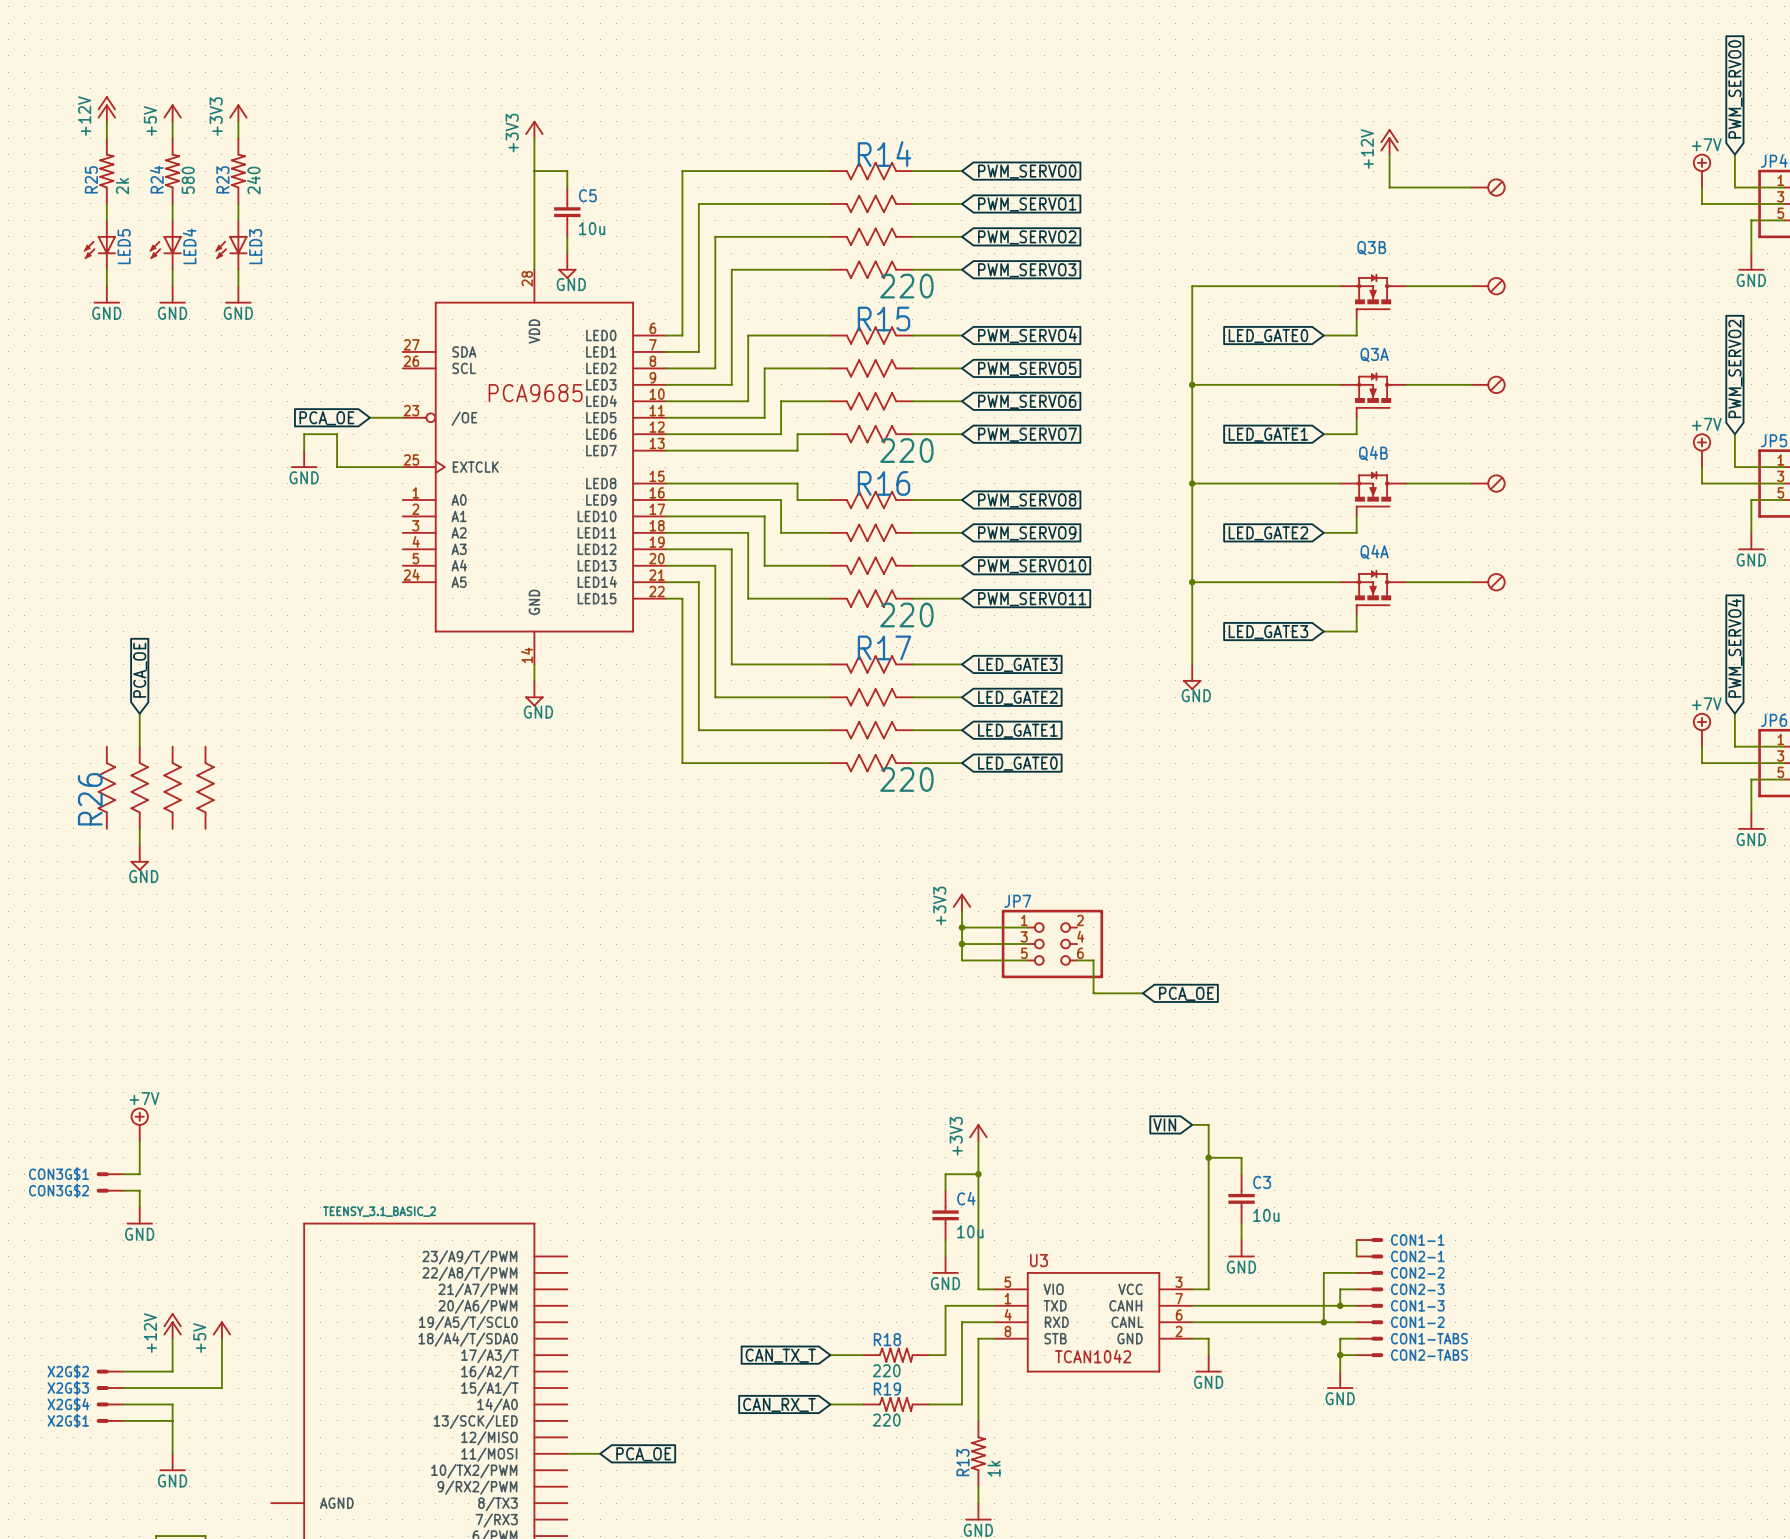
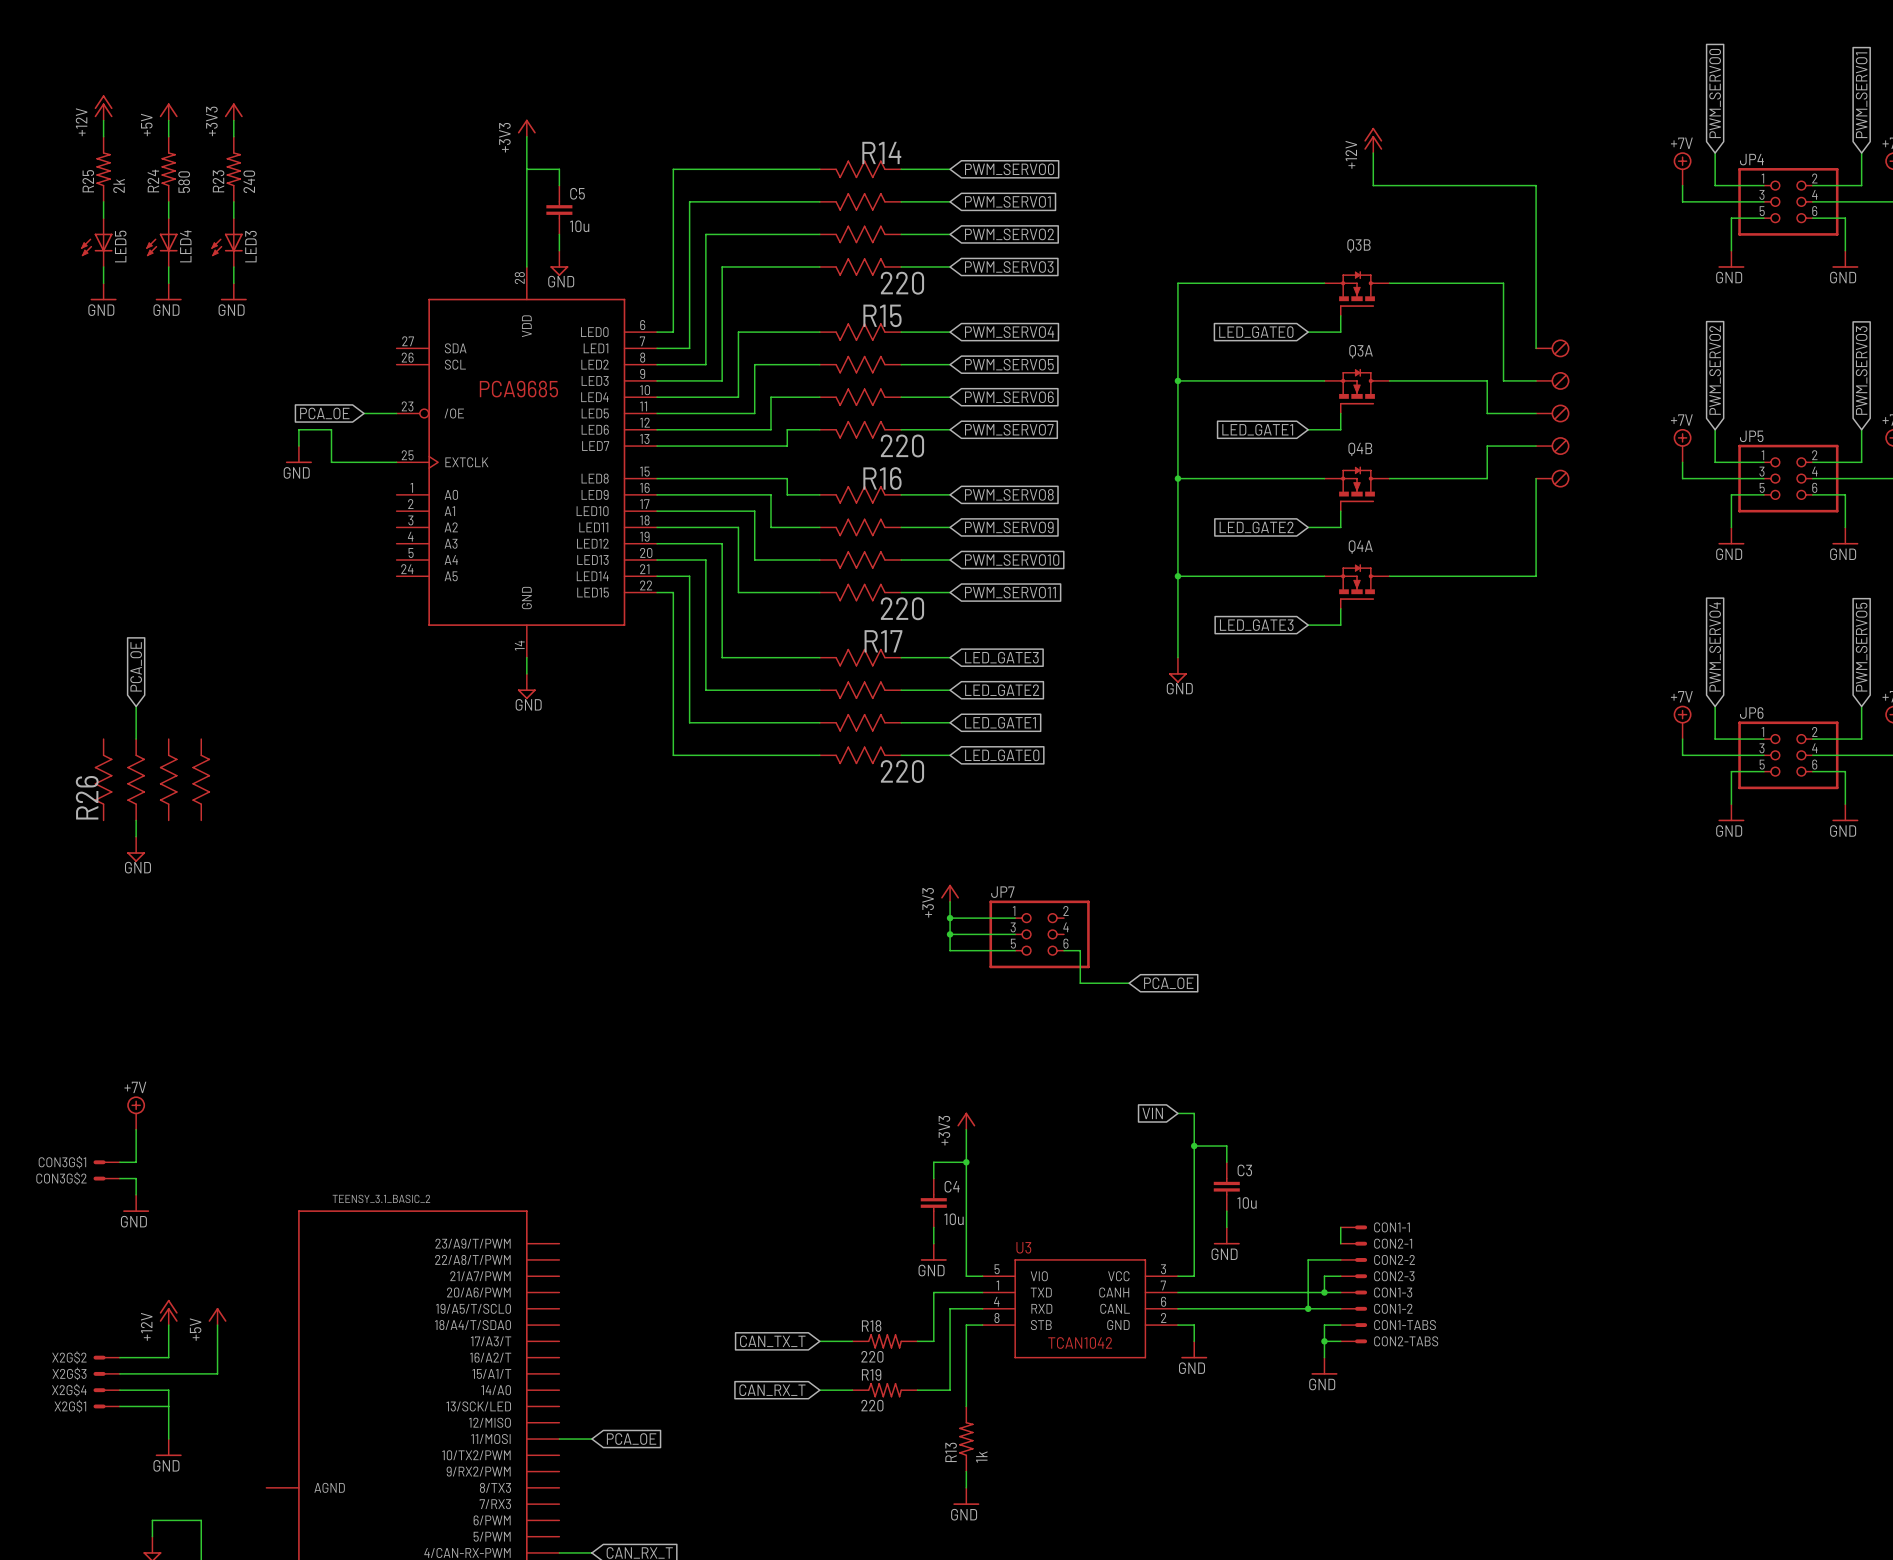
wire: none -> (1454, 185) (1536, 185) (1536, 348)
part: (1488, 187) -> none
wire: none -> (1454, 283) (1503, 283) (1503, 380) (1536, 380)
part: (1488, 286) -> none
wire: none -> (1454, 380) (1487, 380) (1487, 413) (1536, 413)
part: (1488, 384) -> none
part: none -> (1552, 413)
wire: none -> (1536, 446) (1487, 446) (1487, 478) (1454, 478)
part: (1488, 483) -> none
wire: none -> (1536, 478) (1536, 576) (1454, 576)
part: (1488, 582) -> none

